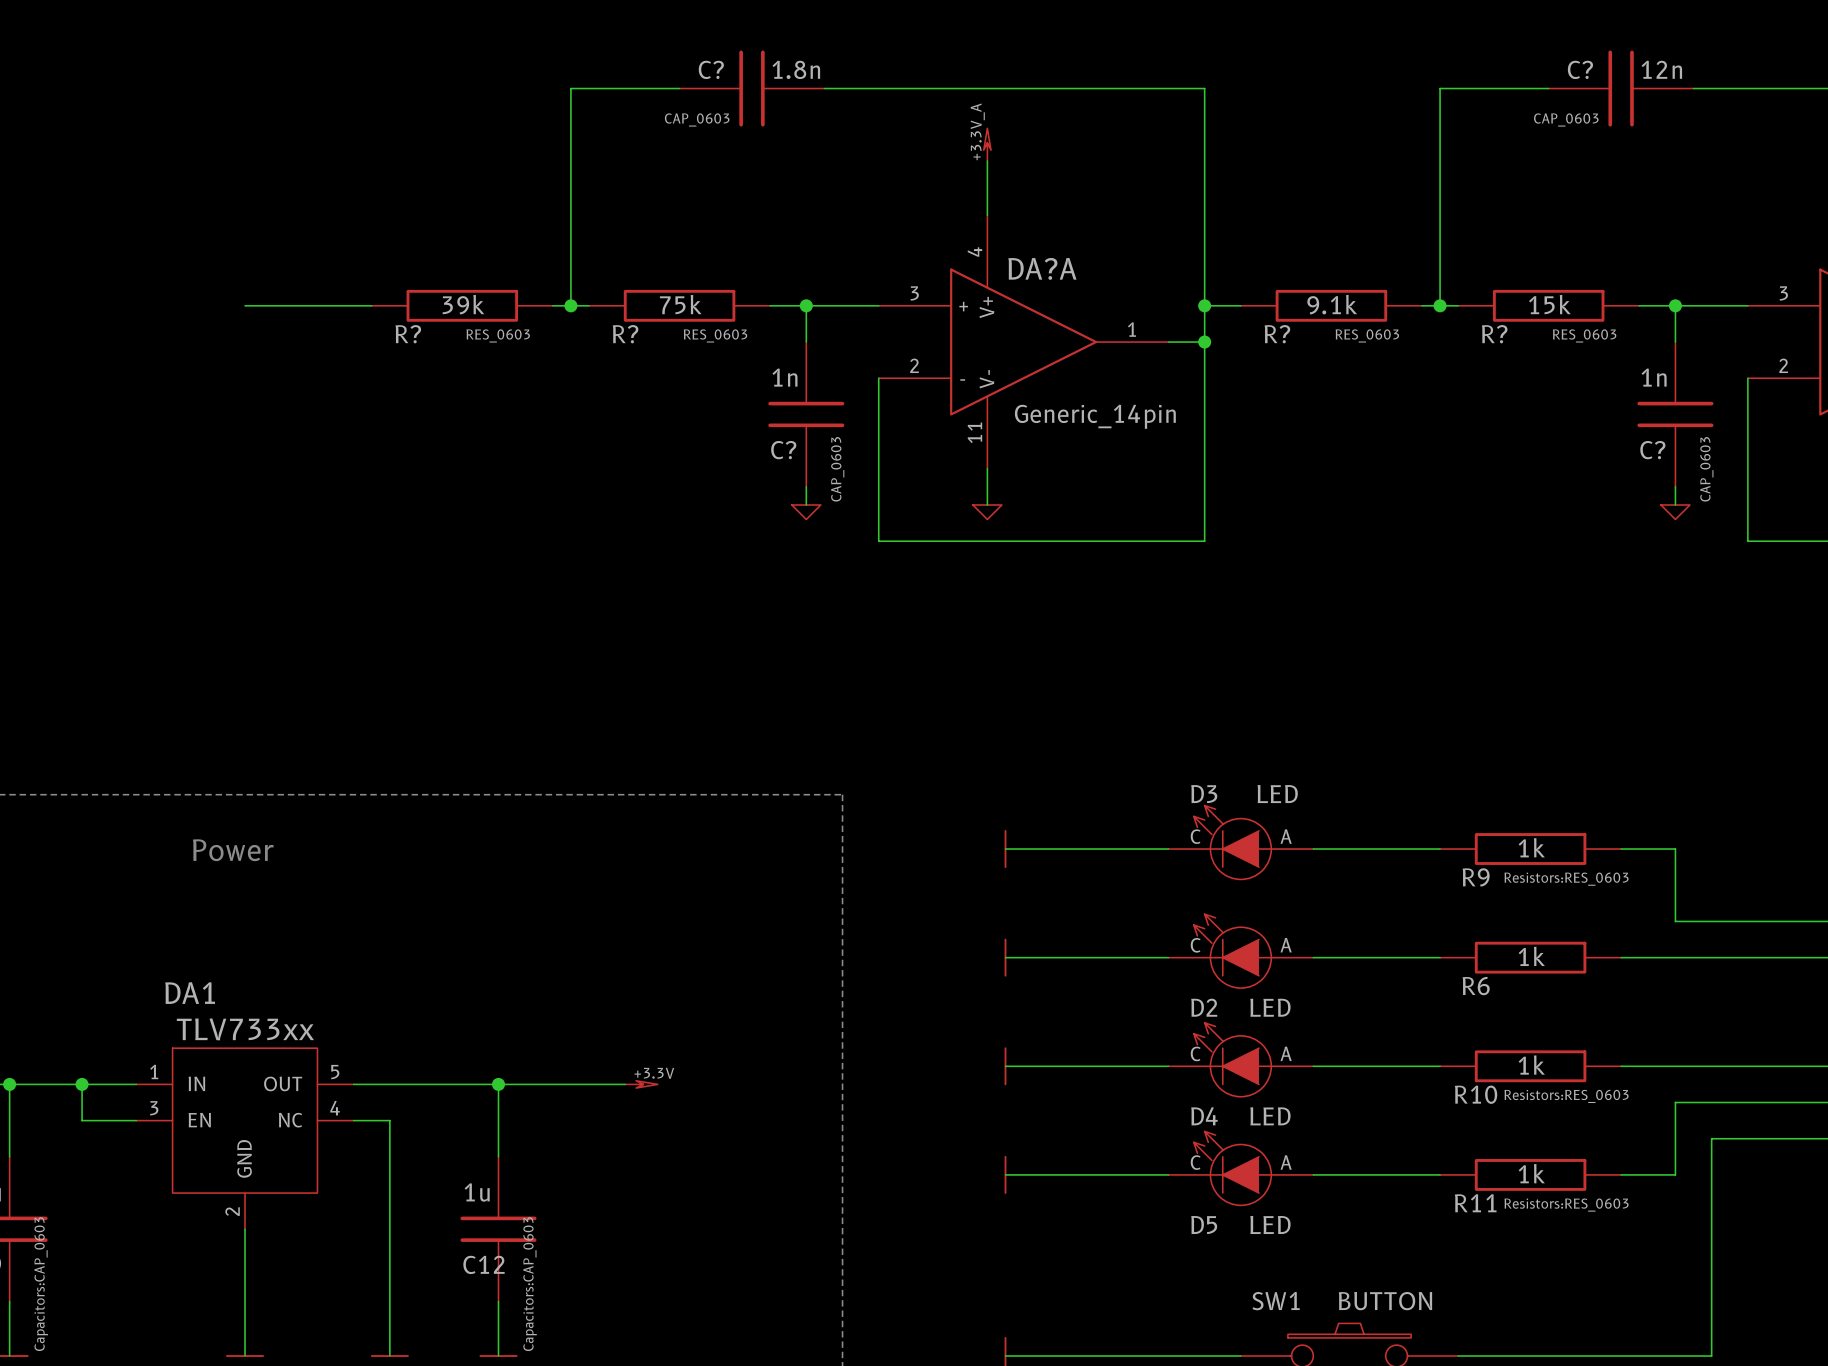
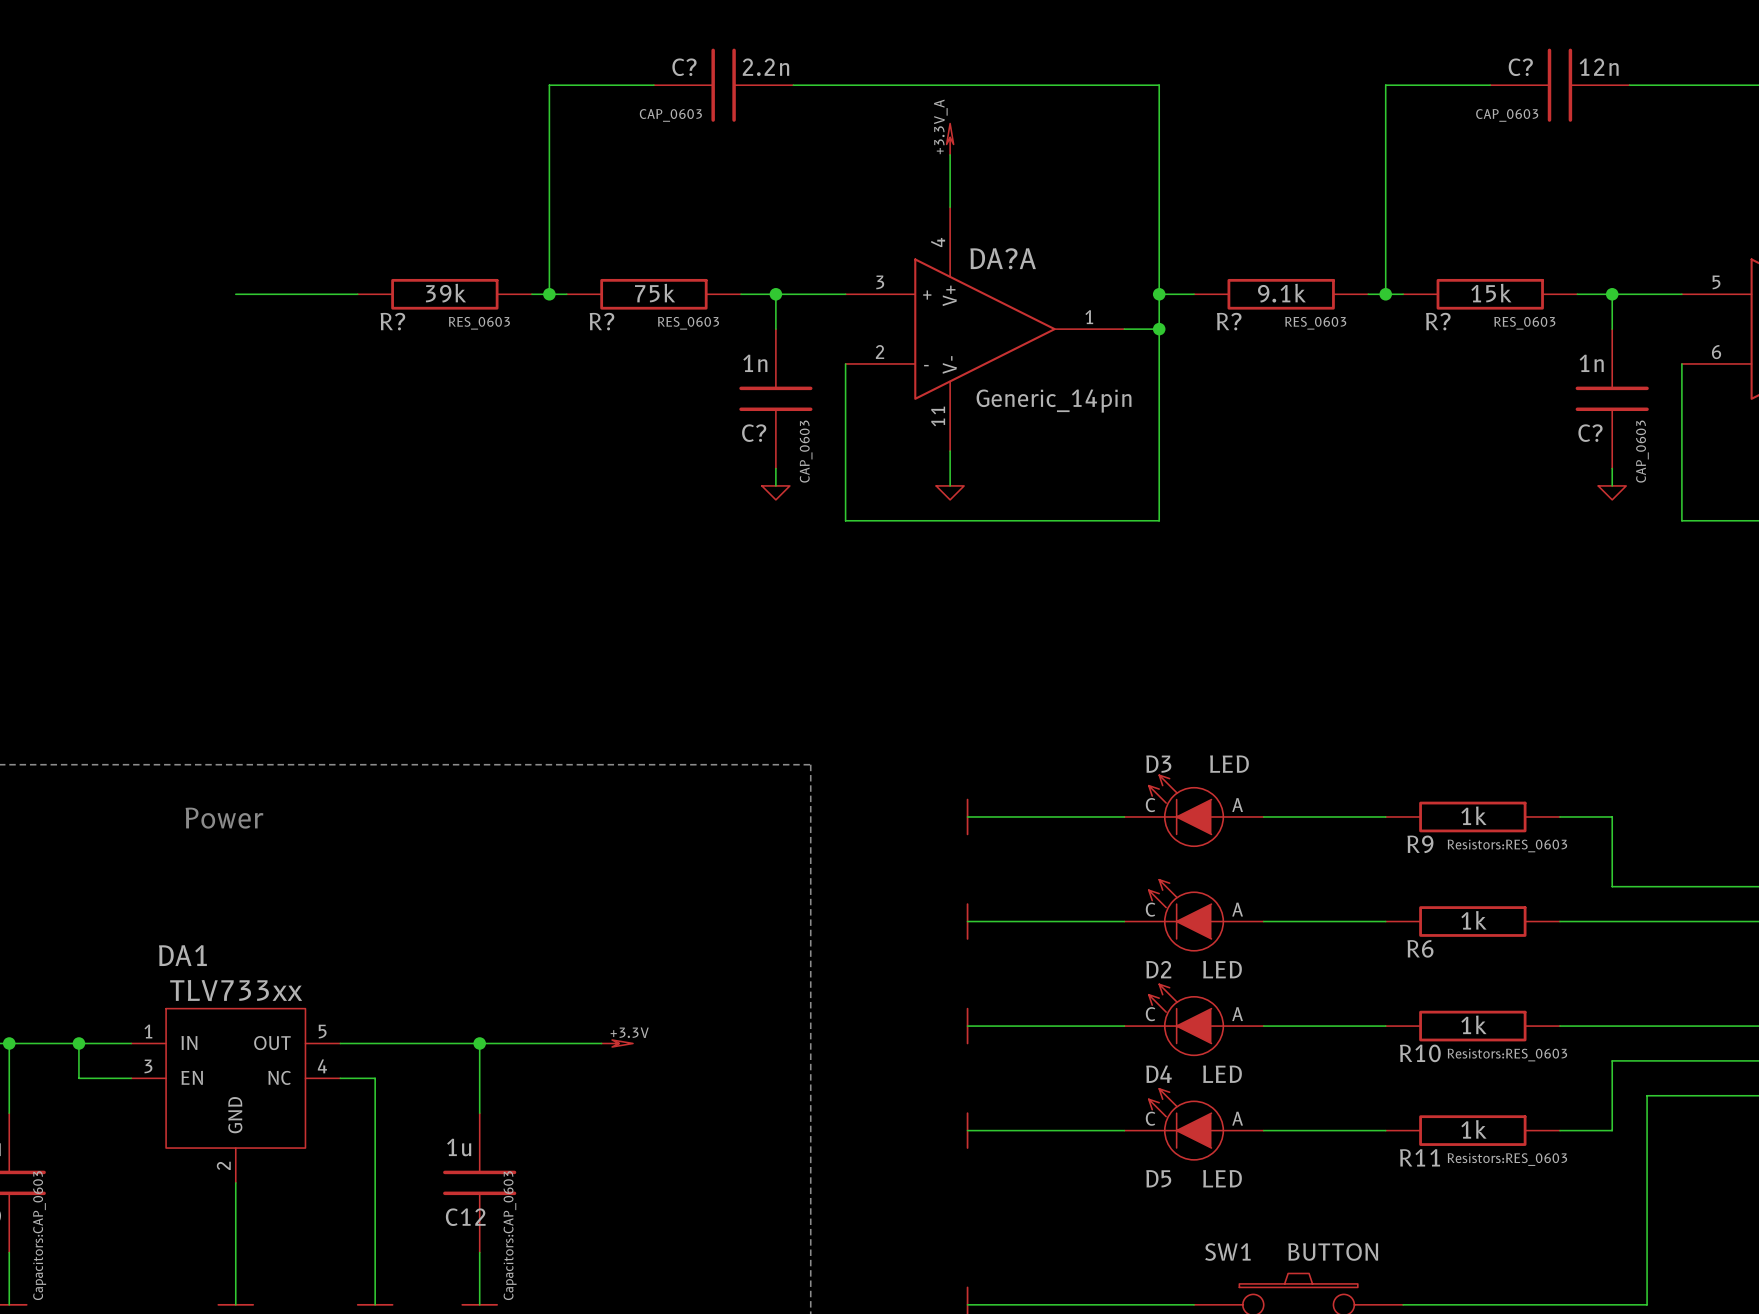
C? value: 1.8n (796, 69) -> 2.2n (765, 67)
part pin number: 3 (1783, 293) -> 5 (1716, 282)
part pin number: 2 (1783, 365) -> 6 (1716, 352)

